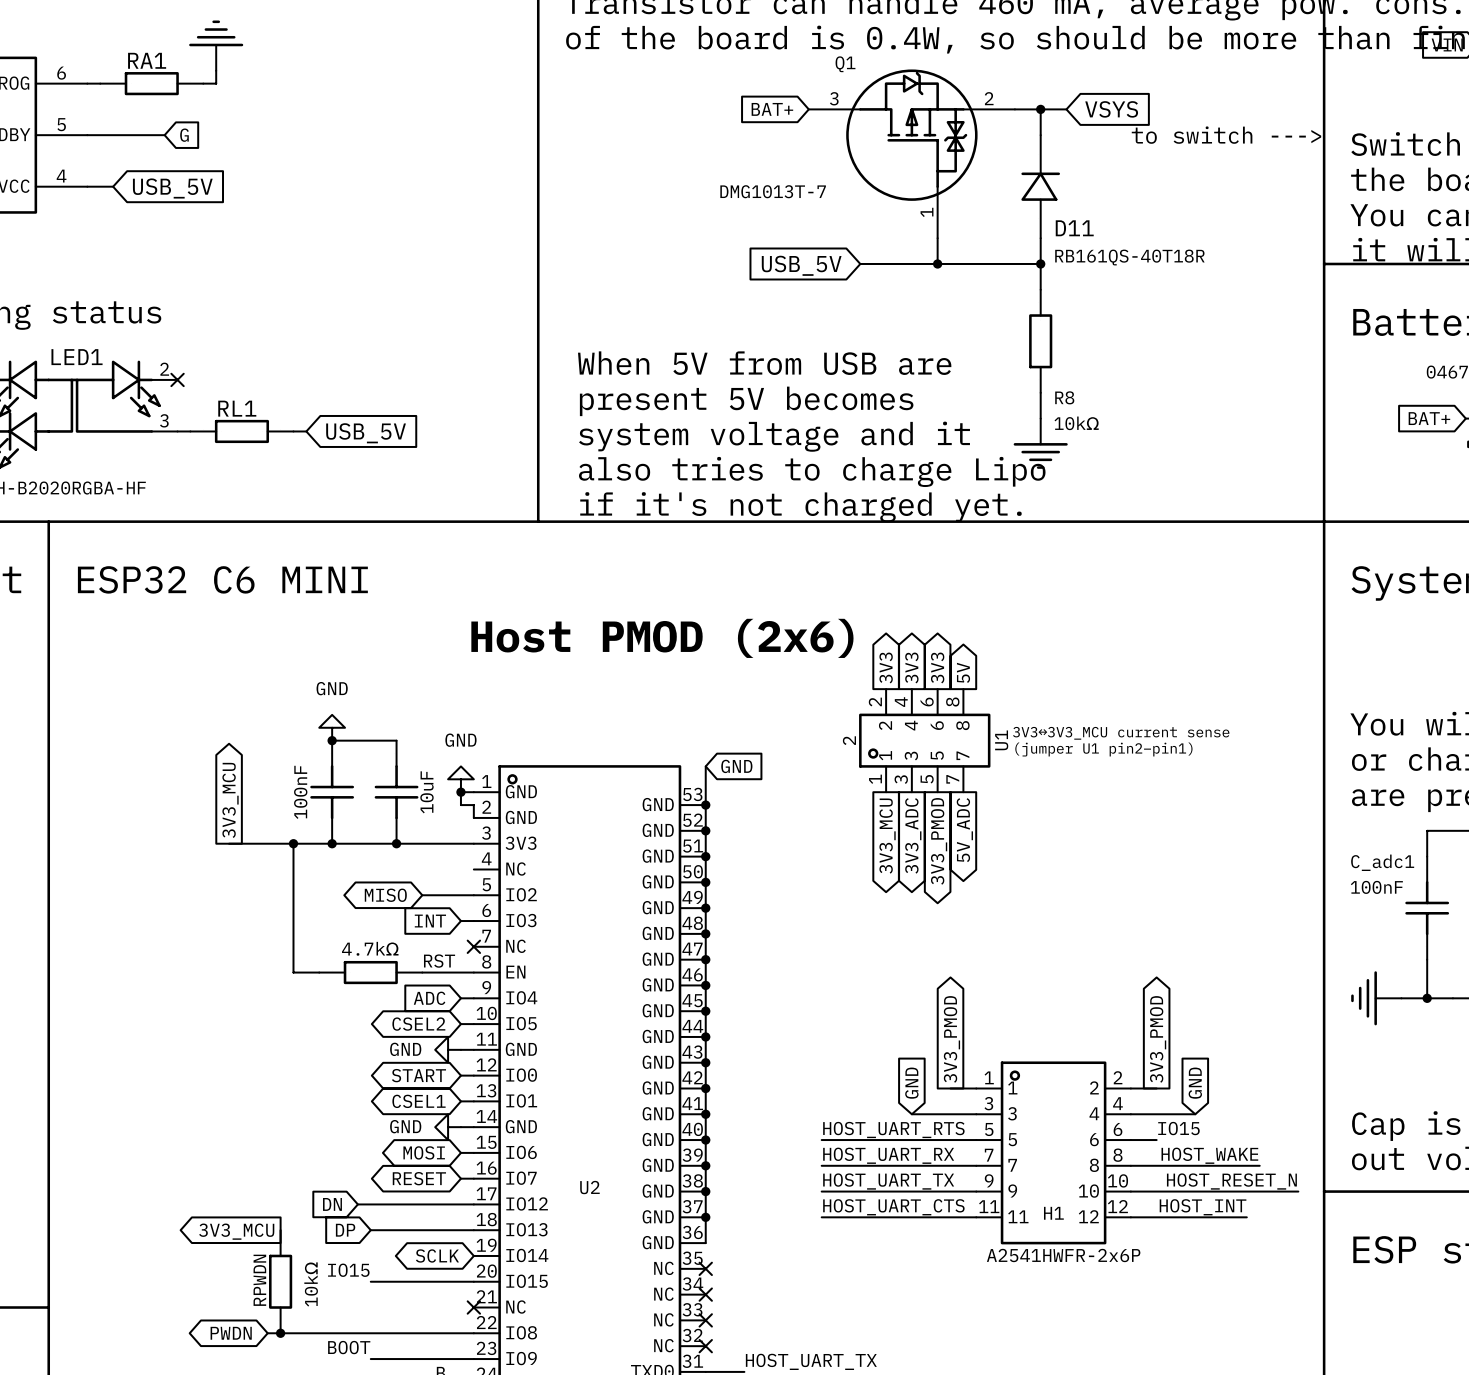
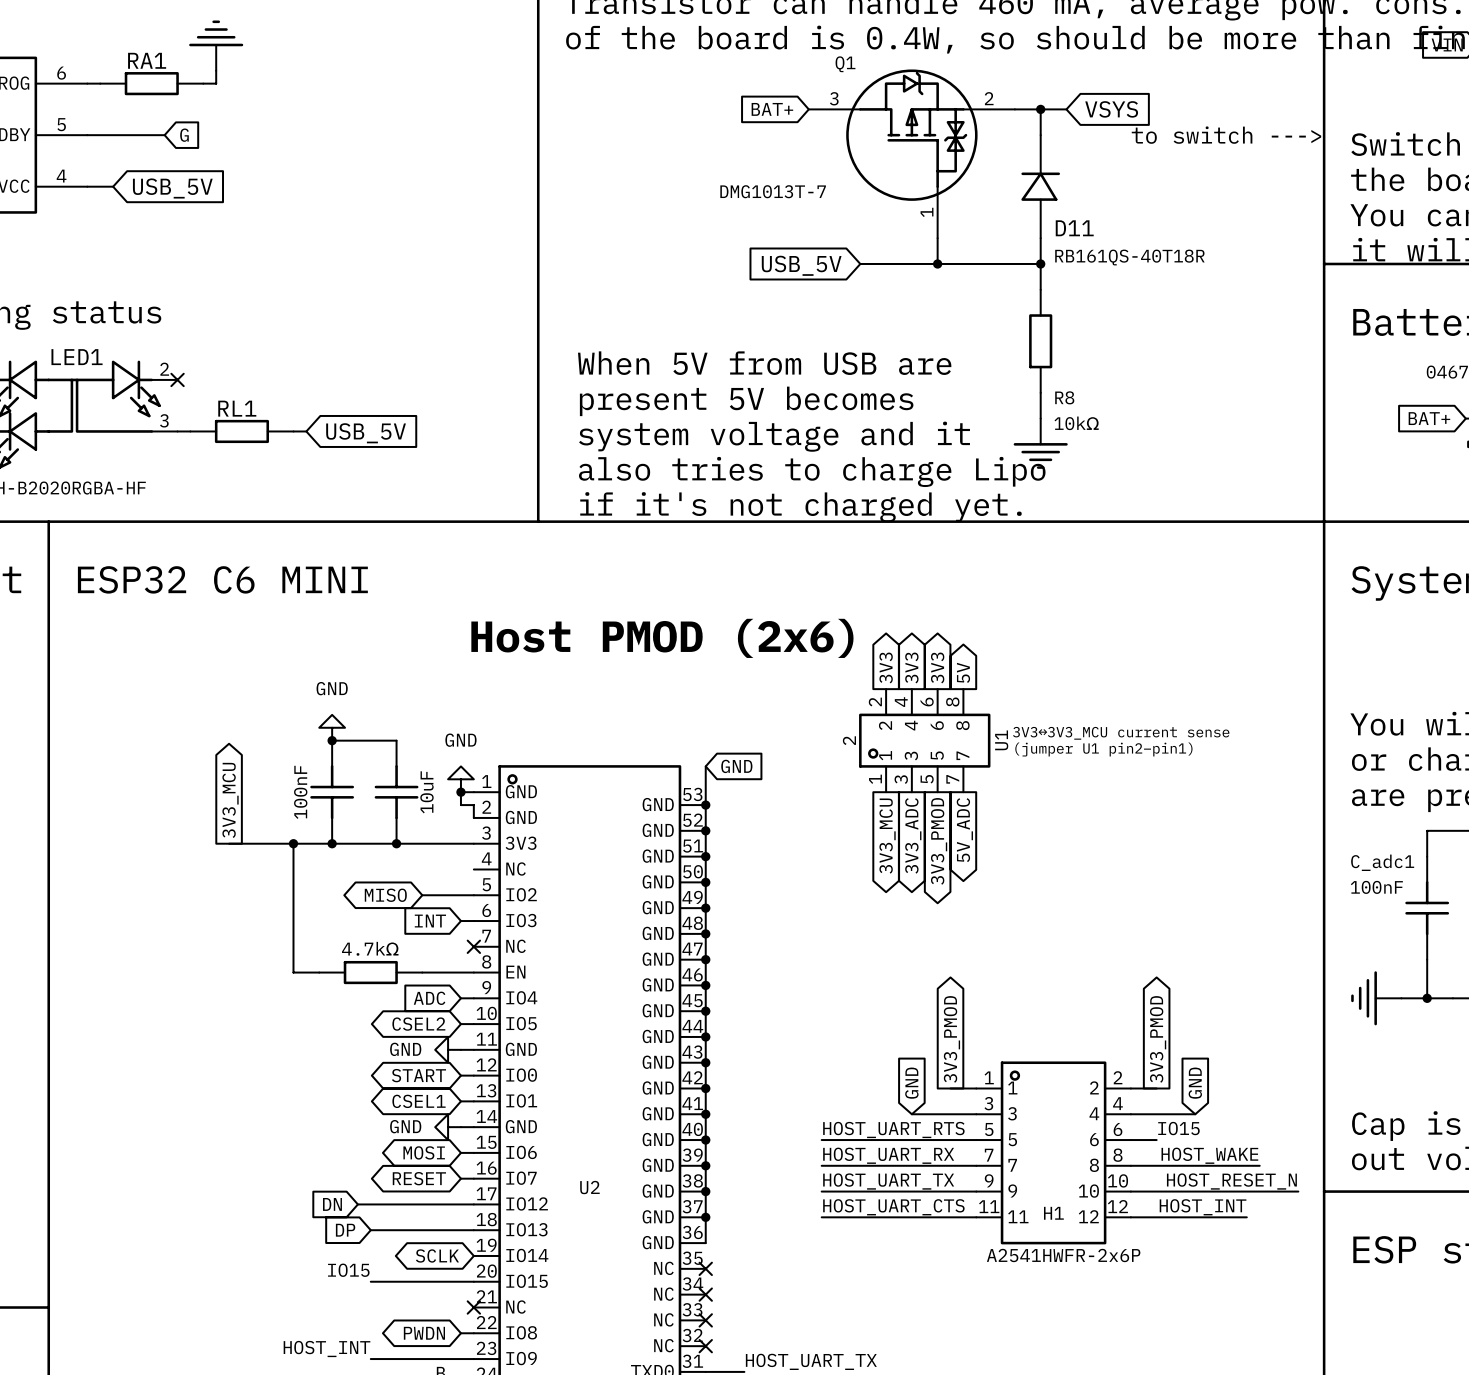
label: RST (439, 961) -> none
global label: 3V3_MCU (236, 1231) -> none
RPWDN: 10kΩ (280, 1281) -> none
global label position: PWDN (231, 1333) -> PWDN (424, 1333)
wire: (267, 1333) (460, 1333) -> none
junction: (280, 1333) -> none
label: BOOT (349, 1347) -> HOST_INT (327, 1348)

